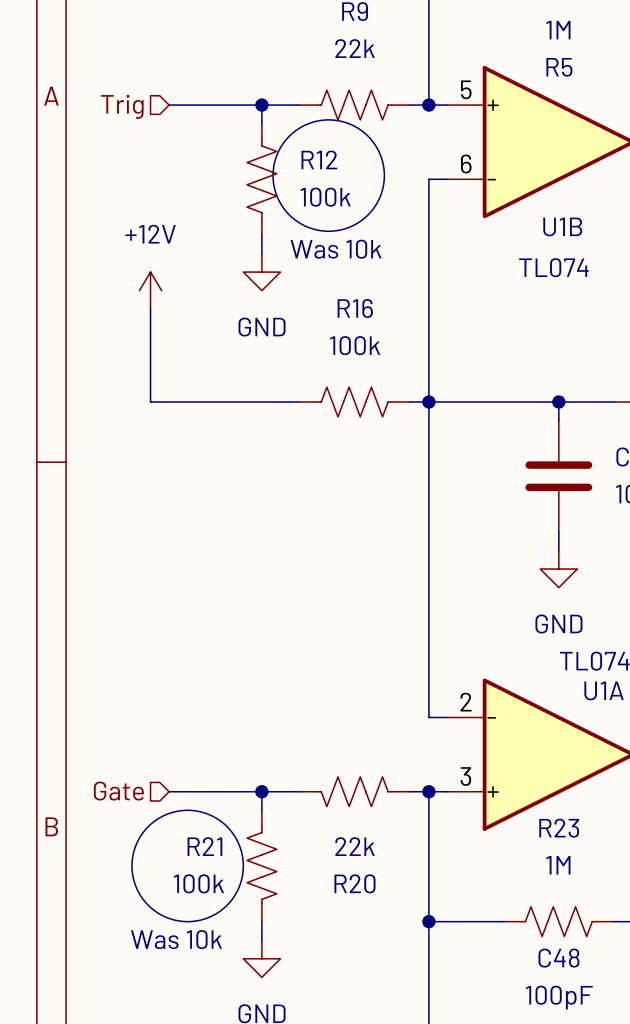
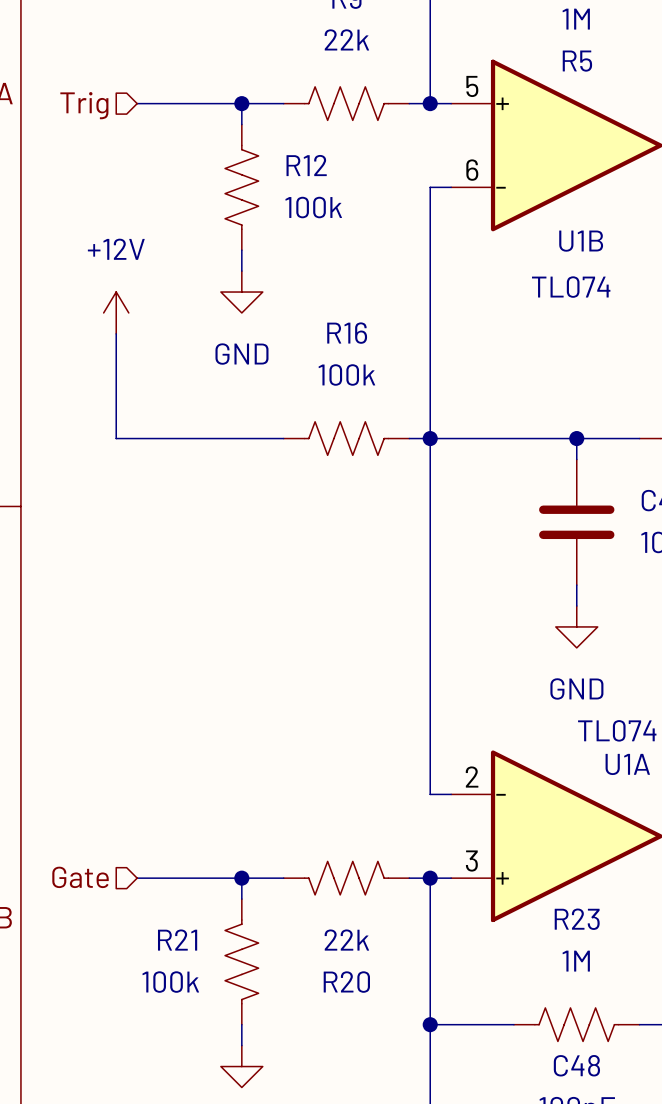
drawing: [273, 119, 385, 232] -> none
text: Was 10k (336, 249) -> none
drawing: [131, 810, 244, 922] -> none
text: Was 10k (176, 939) -> none

